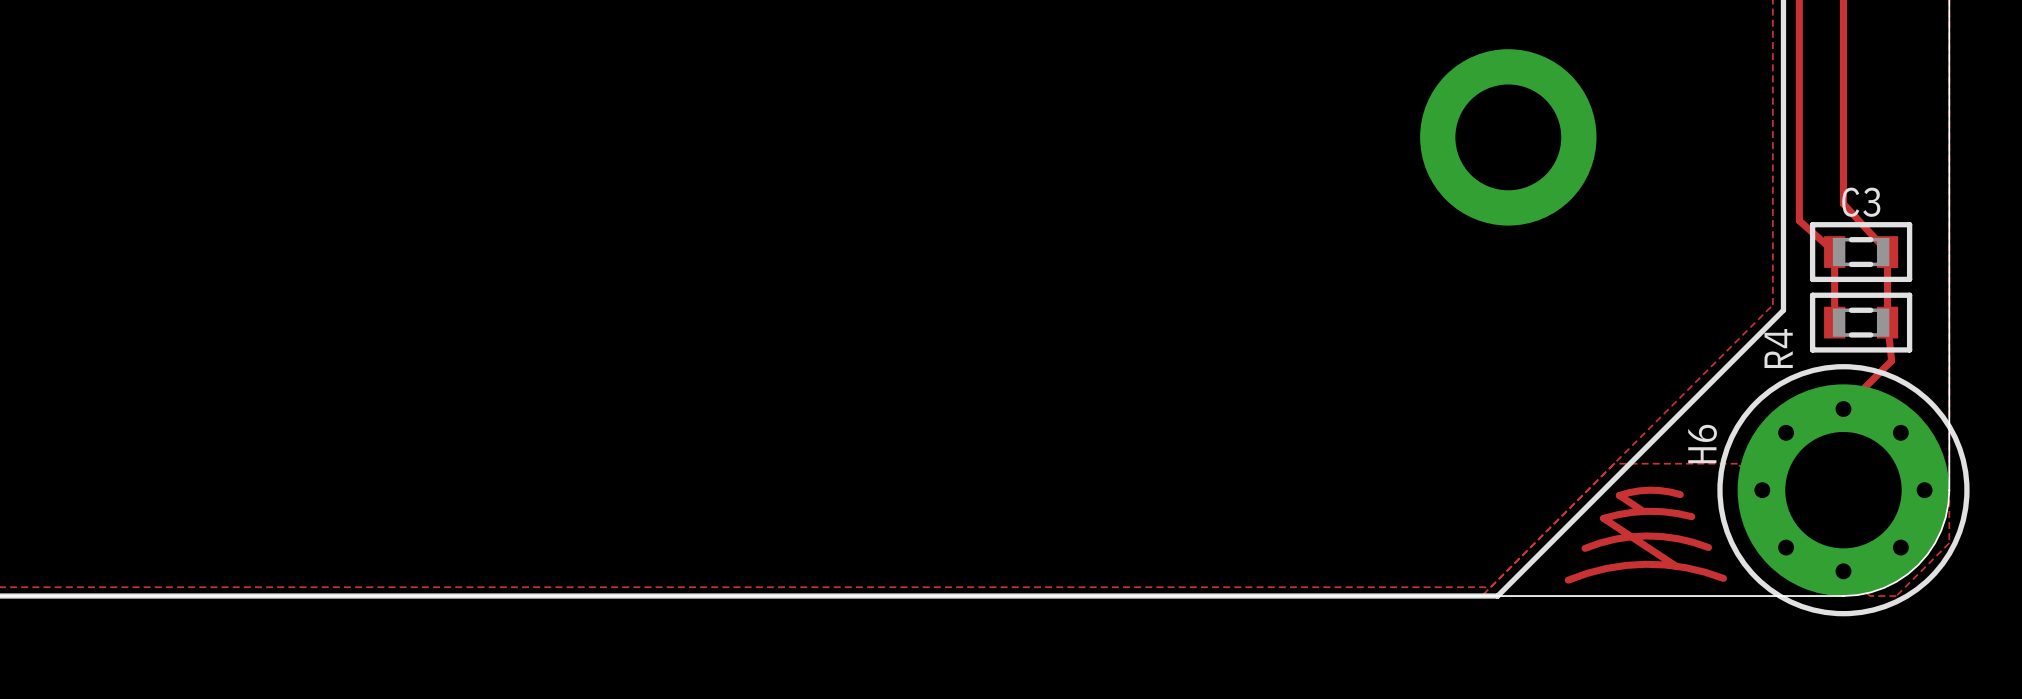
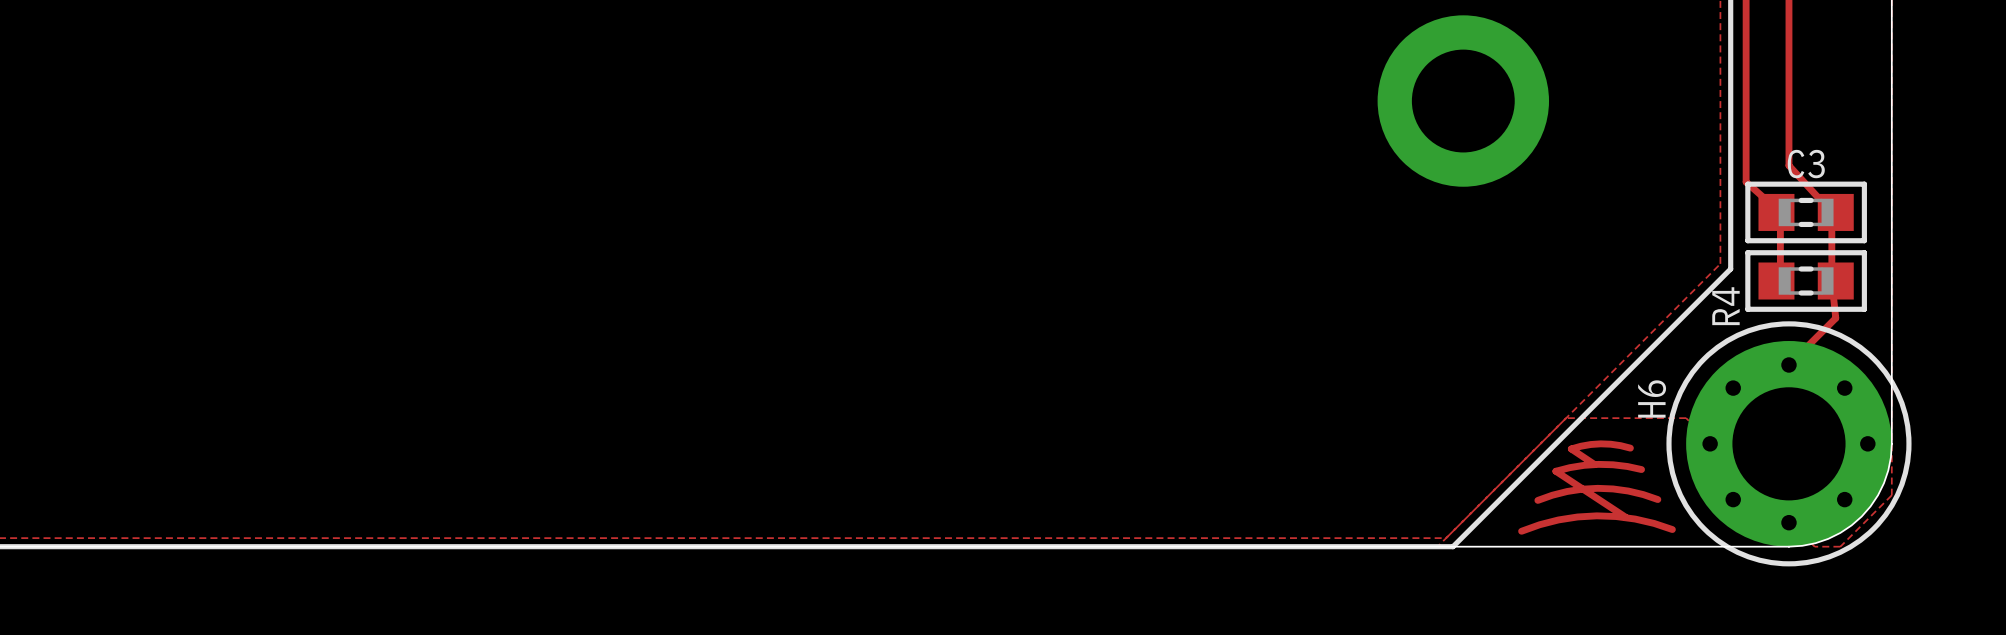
C3 footprint: [1809, 222, 1913, 283] -> [1745, 181, 1867, 244]
R4 footprint: [1809, 292, 1913, 353] -> [1745, 250, 1867, 312]

